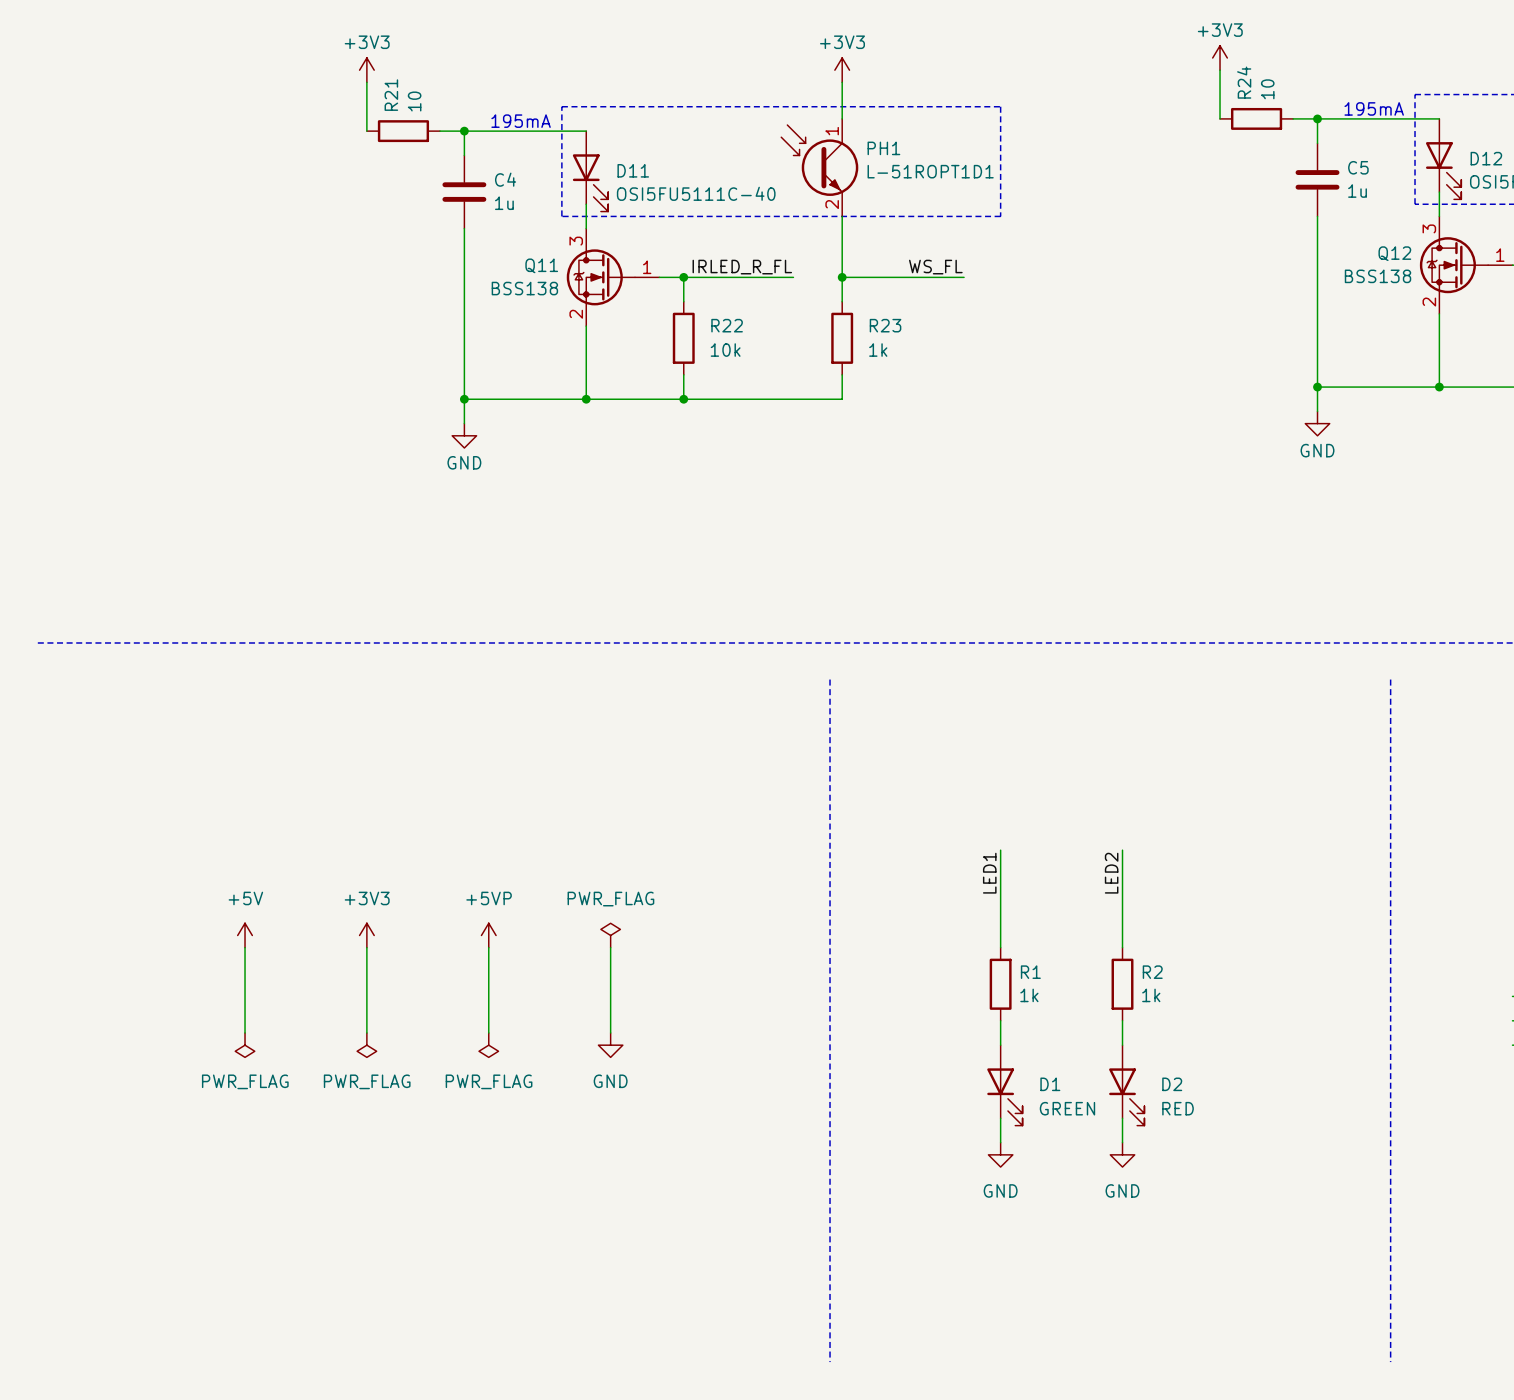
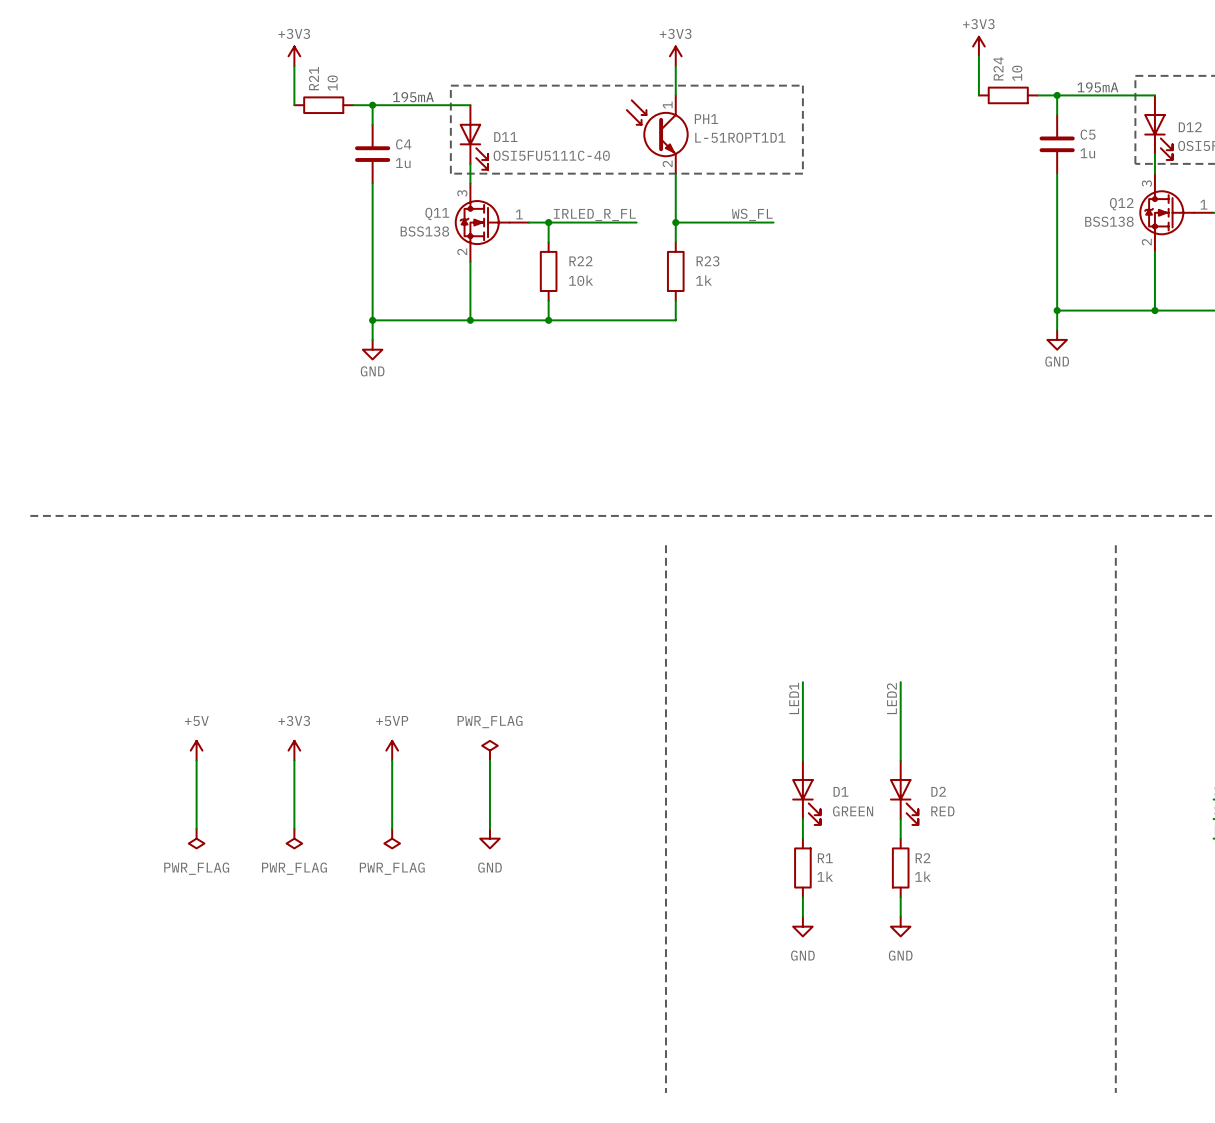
R1 position: (1000, 984) -> (802, 867)
R2 position: (1122, 984) -> (900, 867)
D1 position: (1004, 1085) -> (806, 792)
D2 position: (1126, 1085) -> (904, 792)

